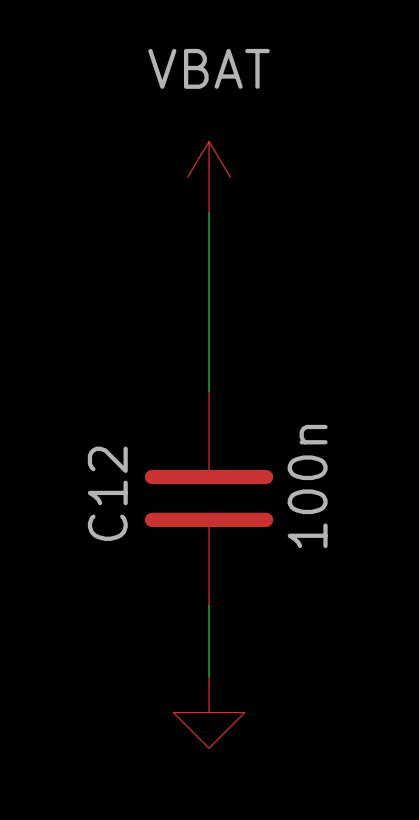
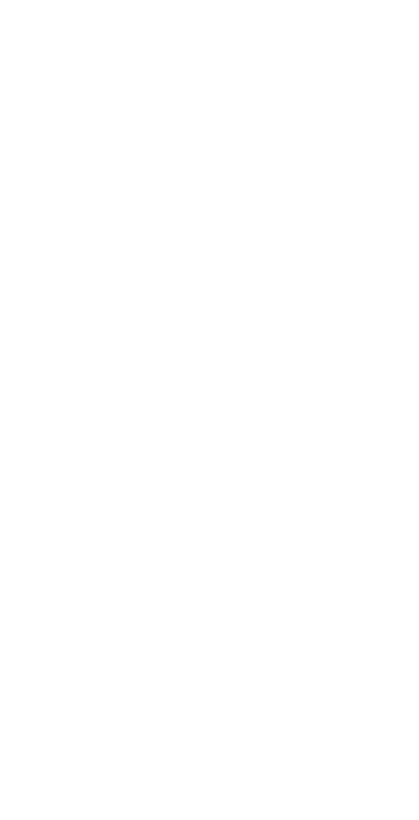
power symbol: VBAT (209, 177) -> none
wire: (209, 212) (209, 391) -> none
C12: 100n (209, 498) -> none
wire: (209, 605) (209, 676) -> none
power symbol: (209, 712) -> none

